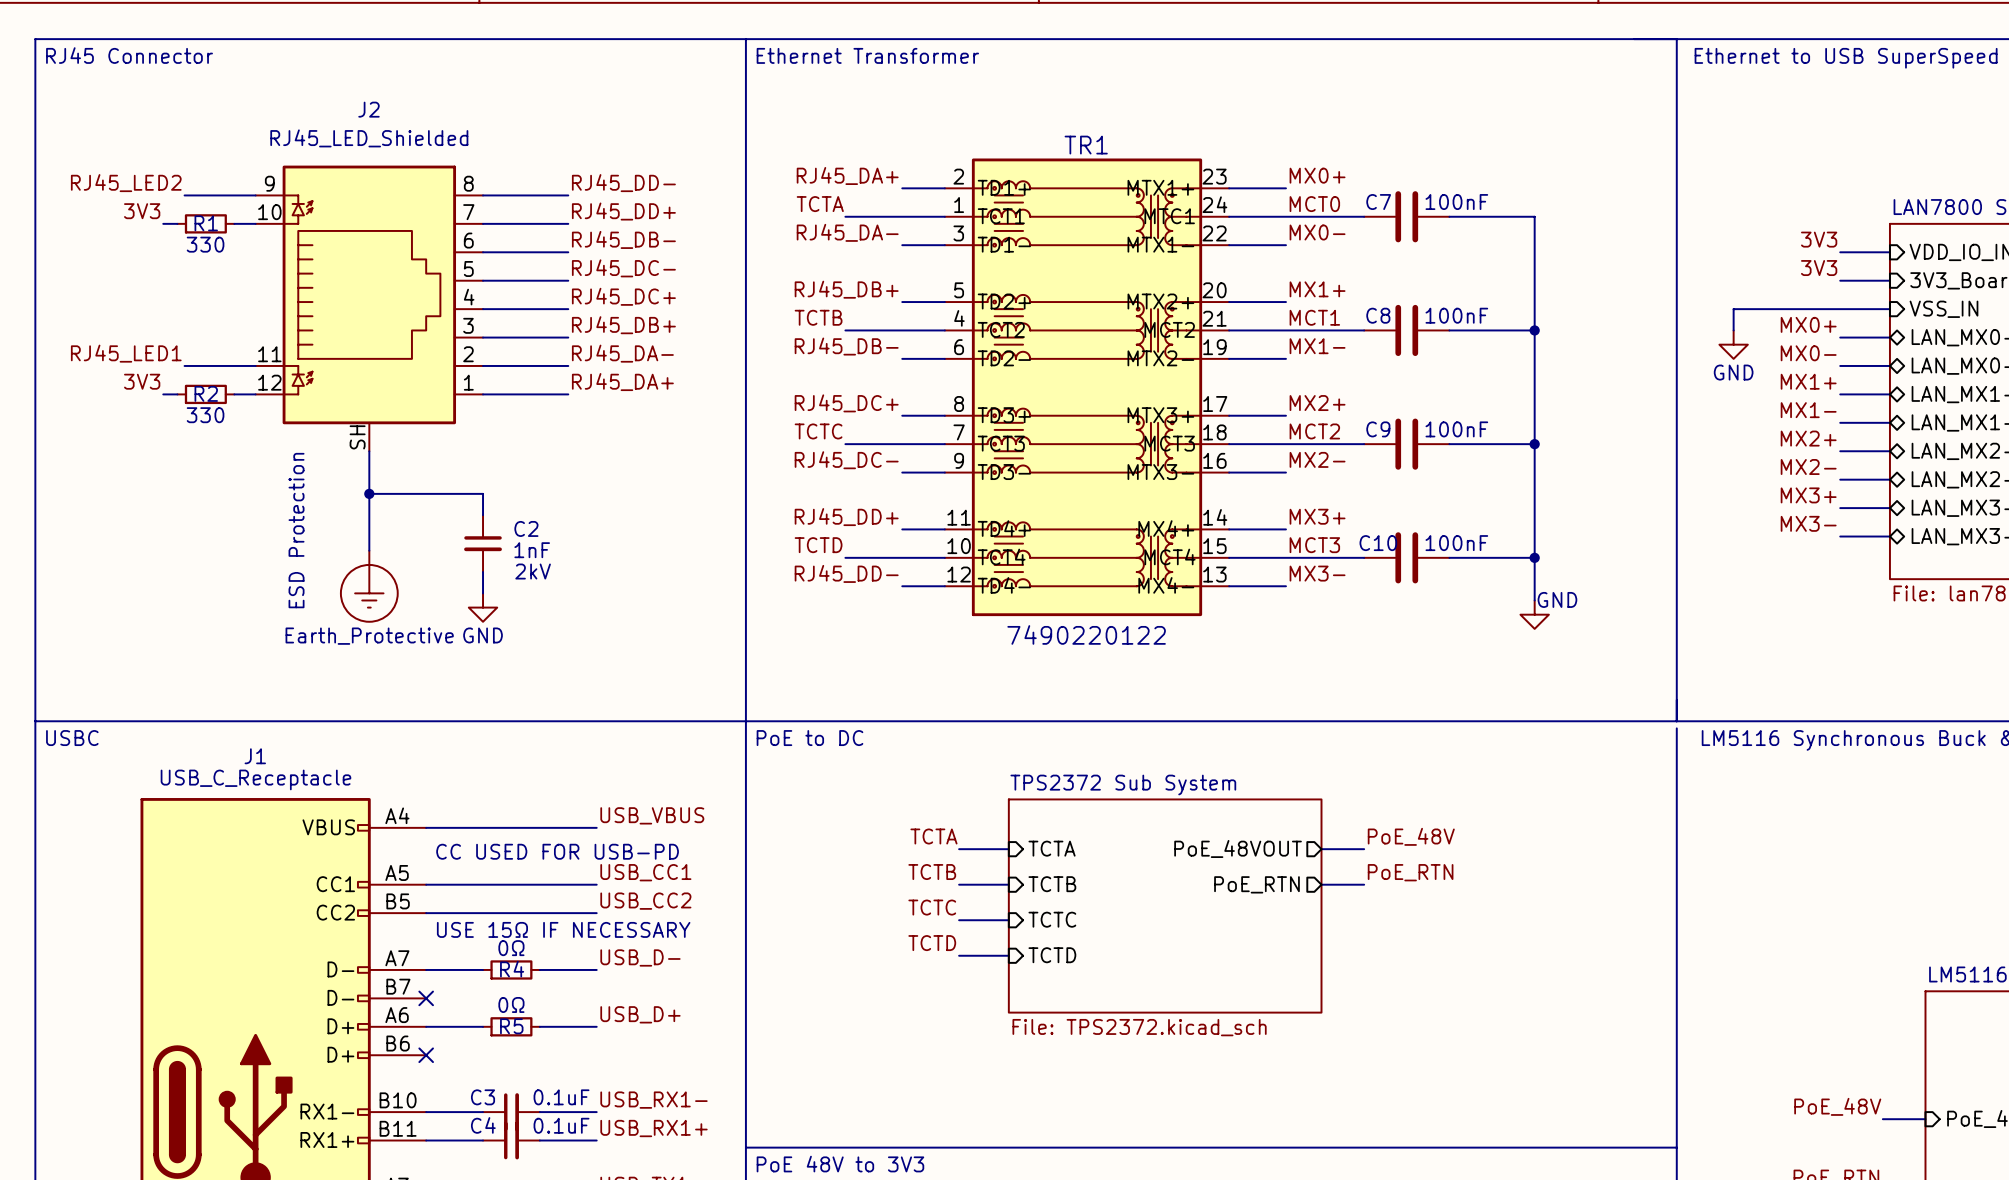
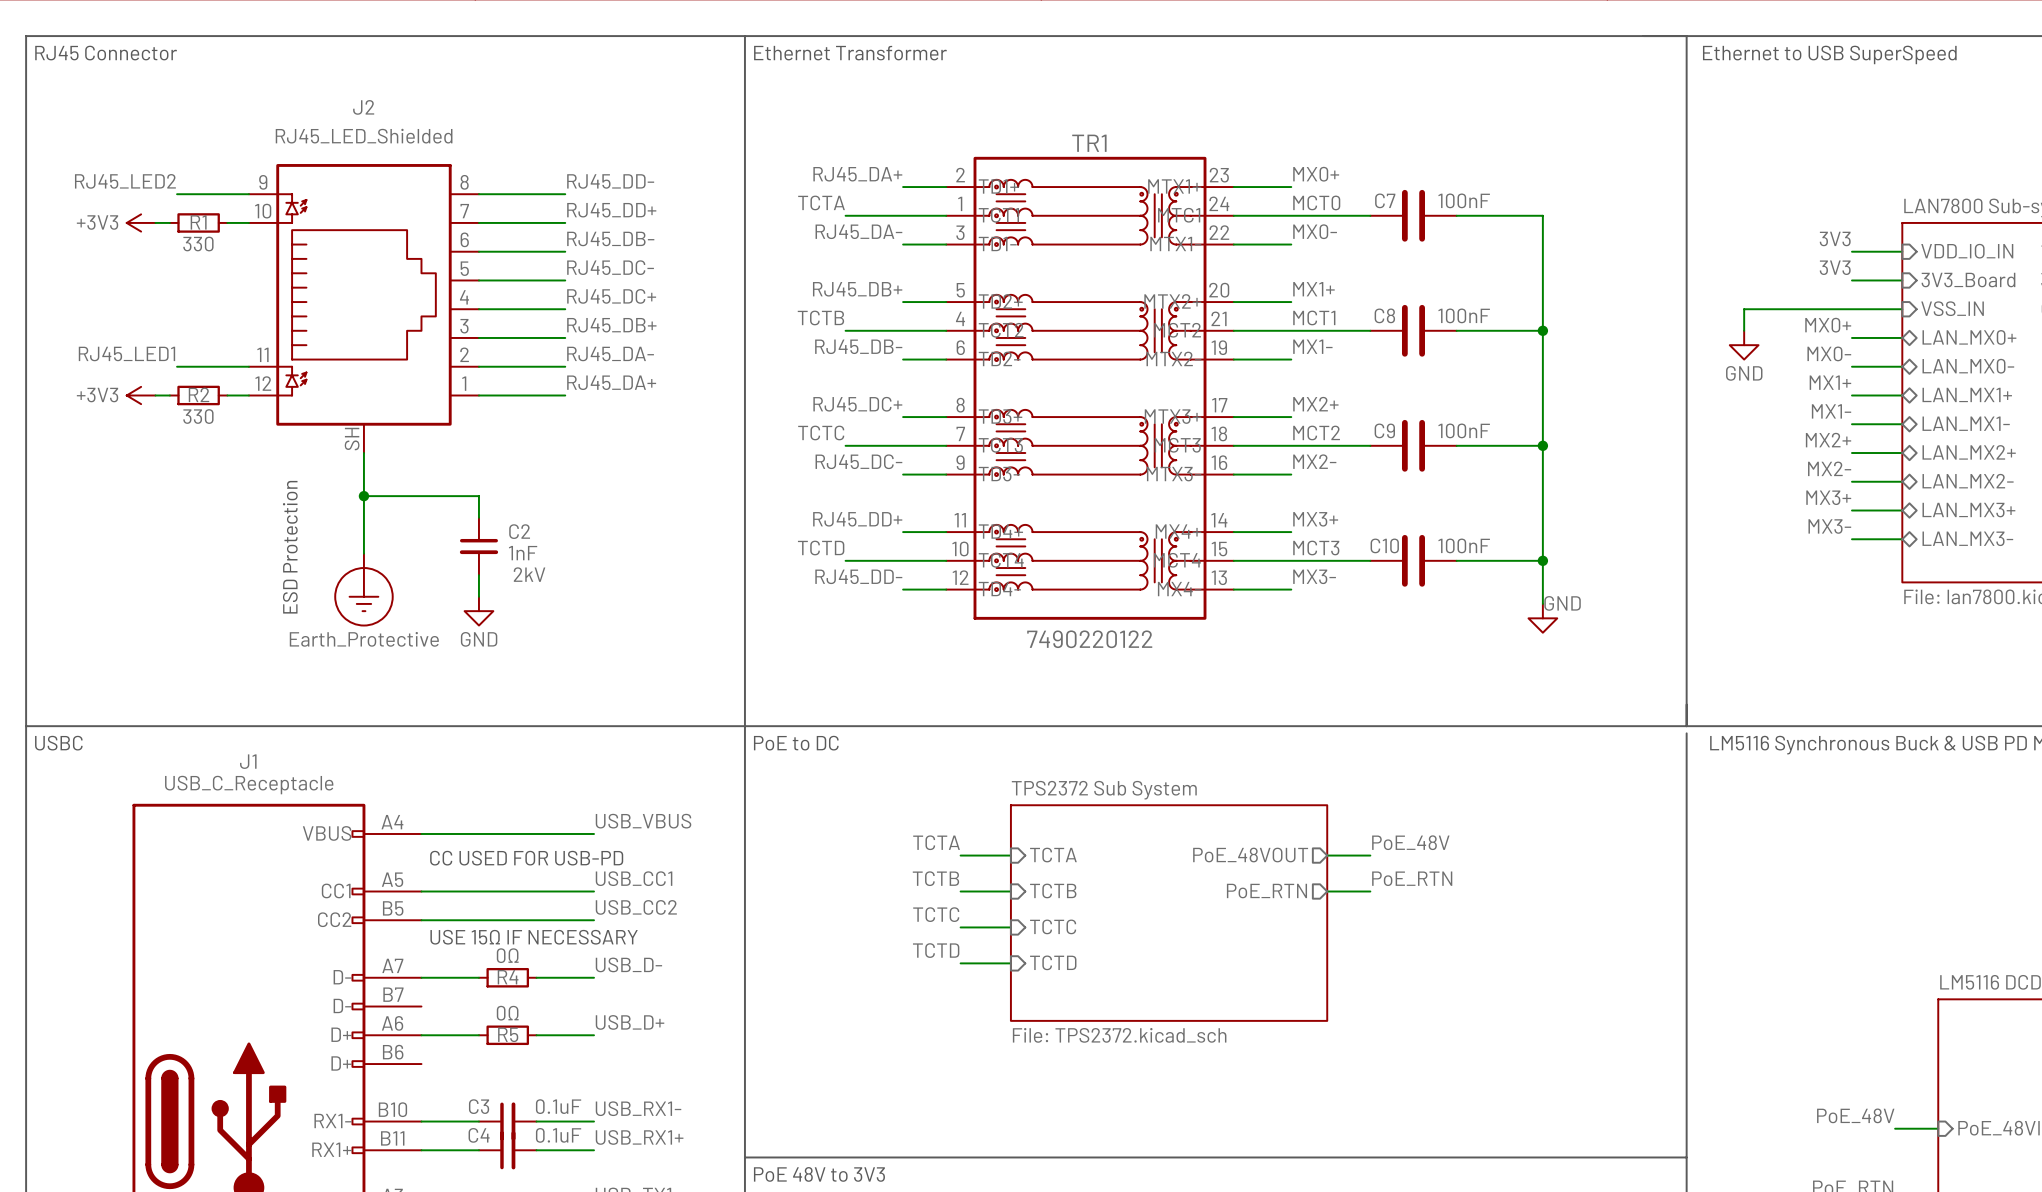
label: 3V3 (142, 211) -> none
power symbol: none -> +3V3 (141, 222)
label: 3V3 (142, 381) -> none
power symbol: none -> +3V3 (141, 395)
no-connect mark: (426, 998) -> none
no-connect mark: (426, 1055) -> none

